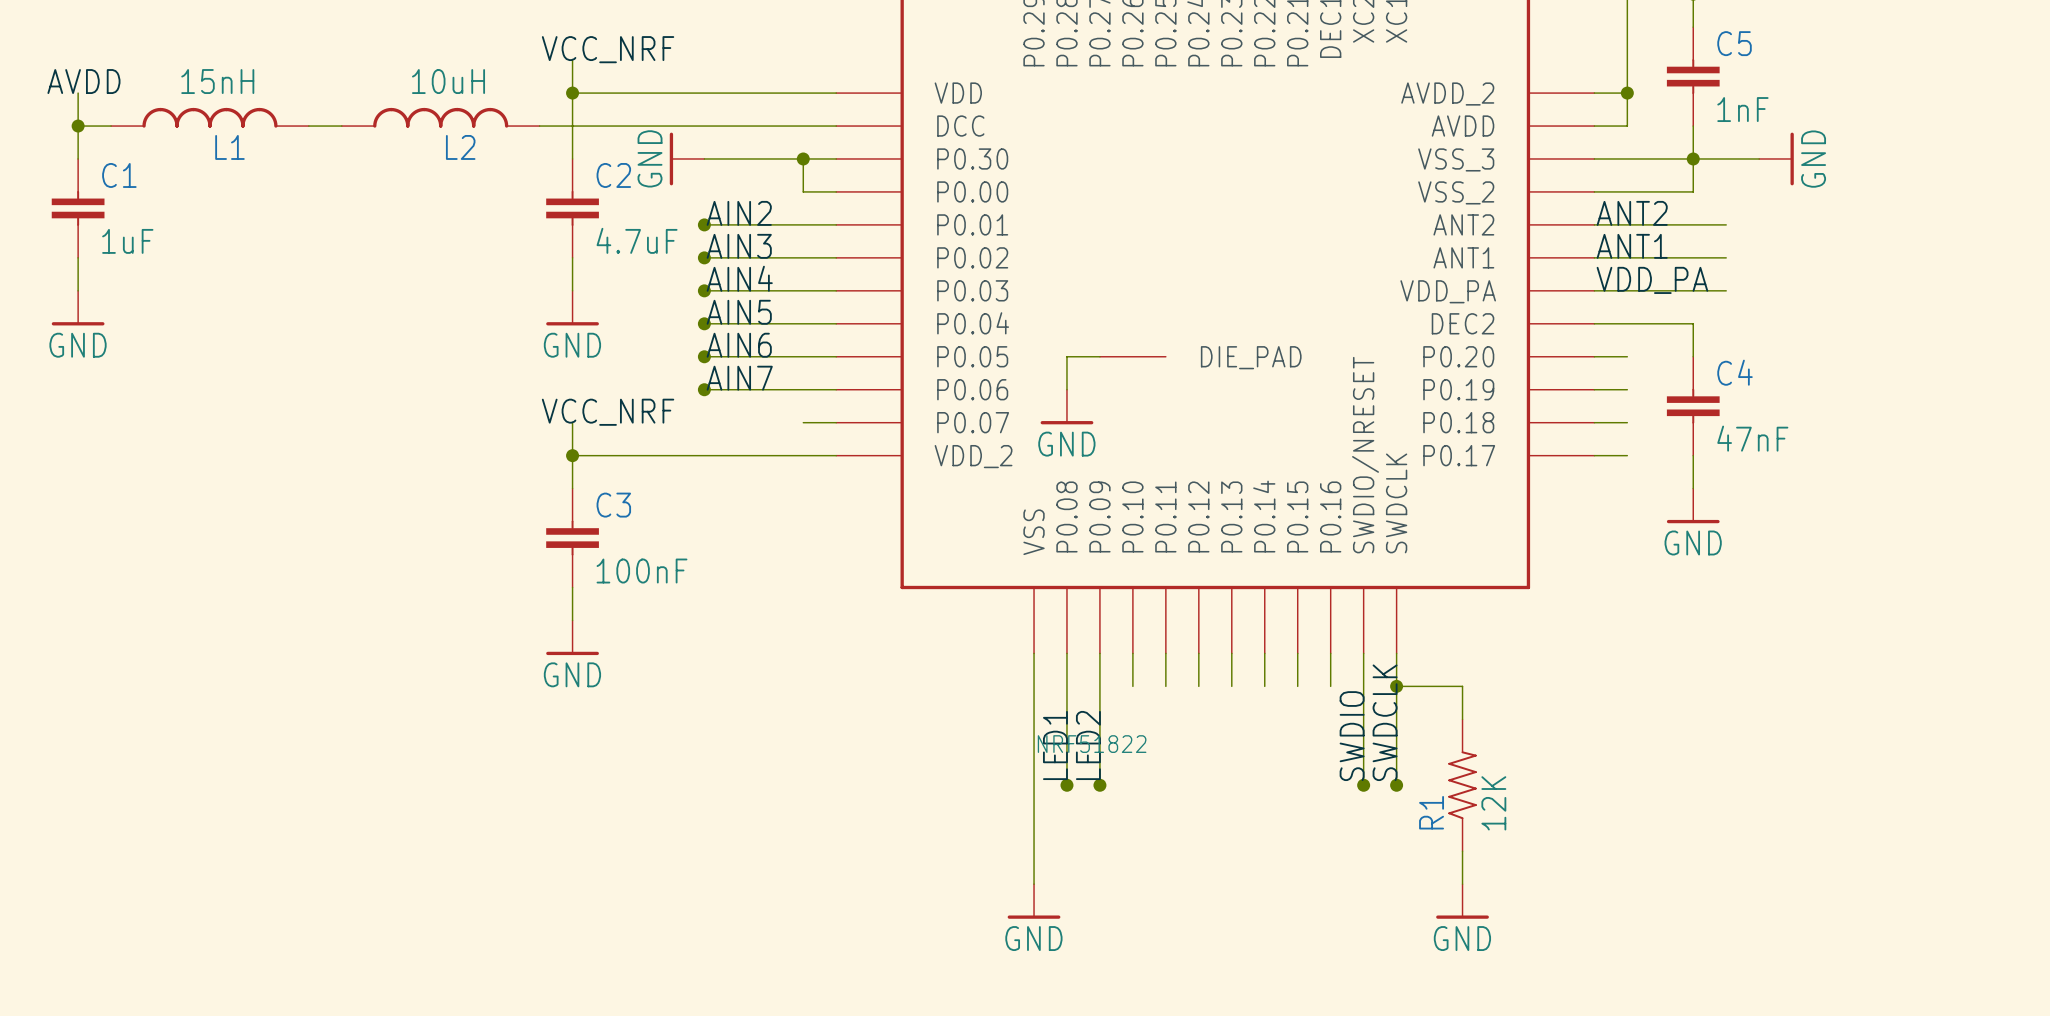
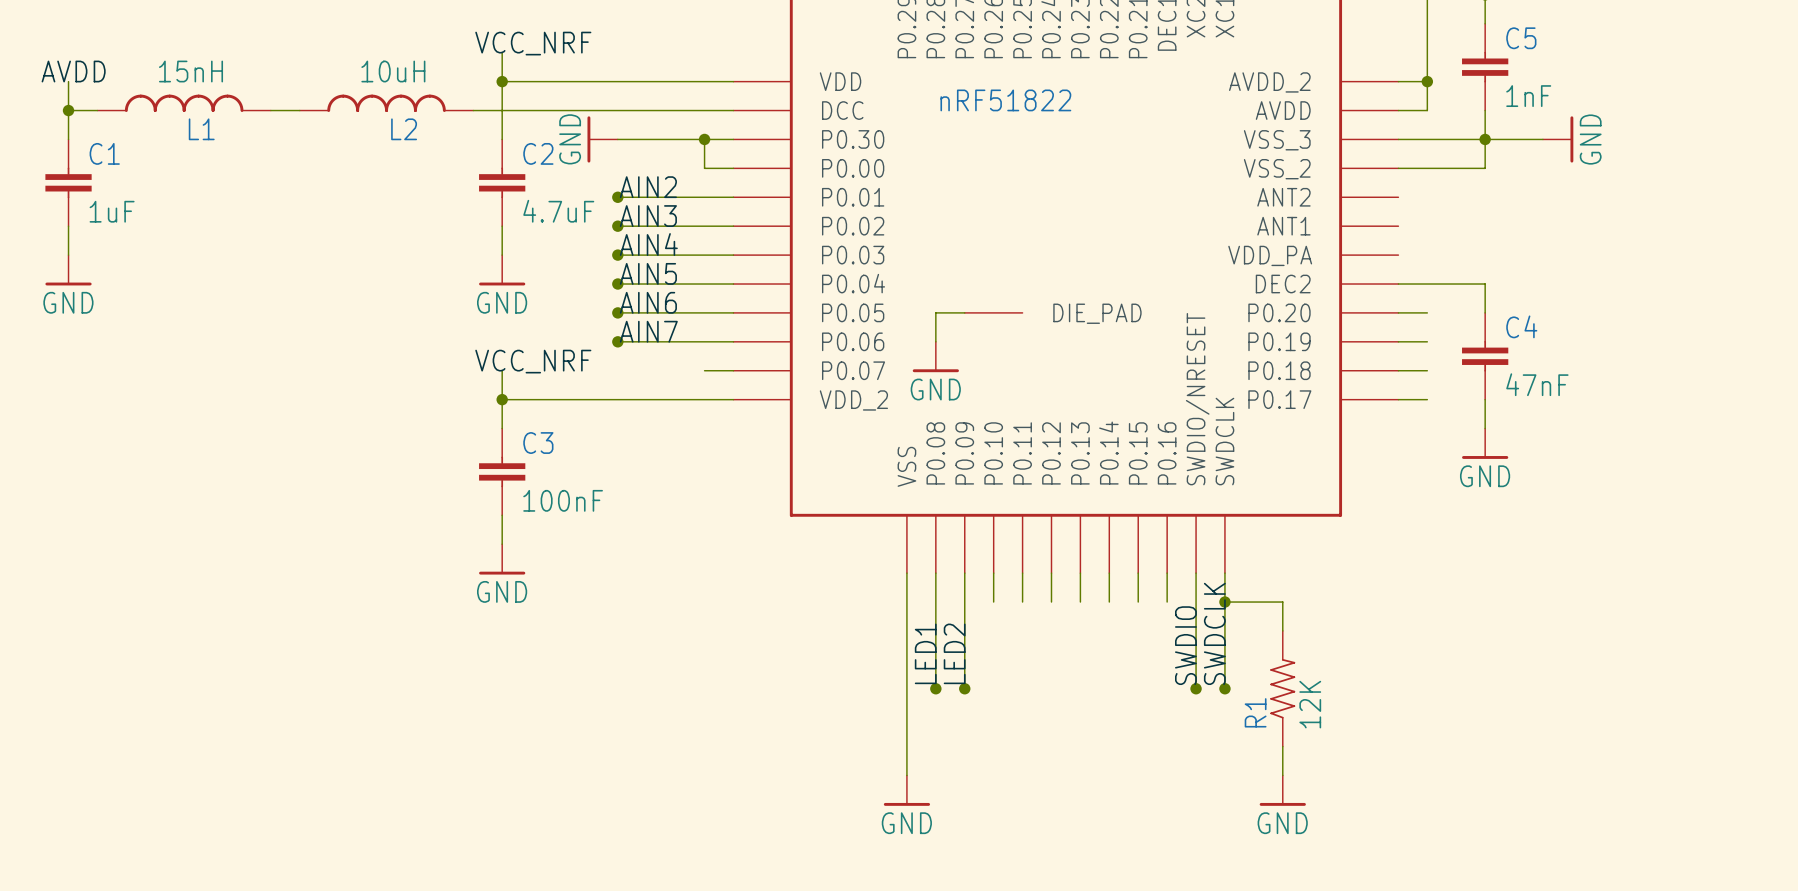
part text: none -> nRF51822 (1005, 100)
label: ANT2 (1632, 213) -> none
wire: (1594, 224) (1726, 224) -> none
label: ANT1 (1632, 246) -> none
wire: (1594, 257) (1726, 257) -> none
label: VDD_PA (1652, 280) -> none
wire: (1594, 290) (1726, 290) -> none
part value: NRF51822 (1092, 744) -> none

